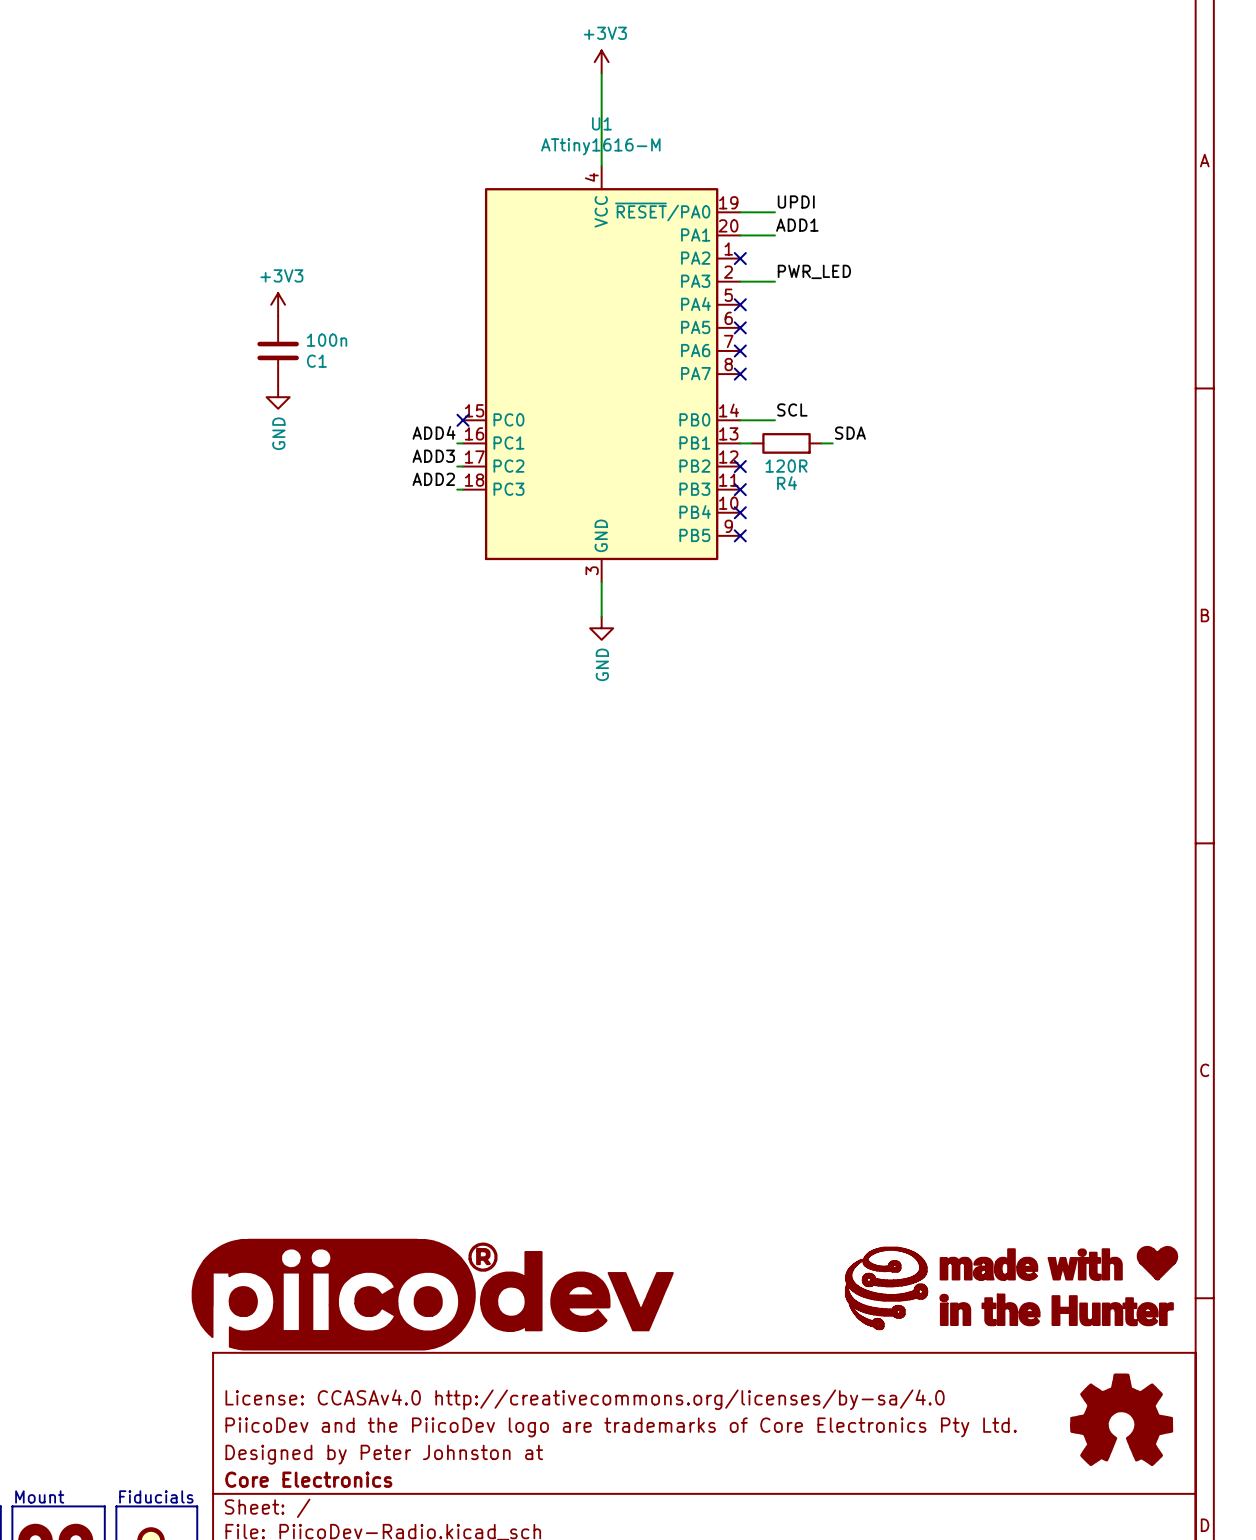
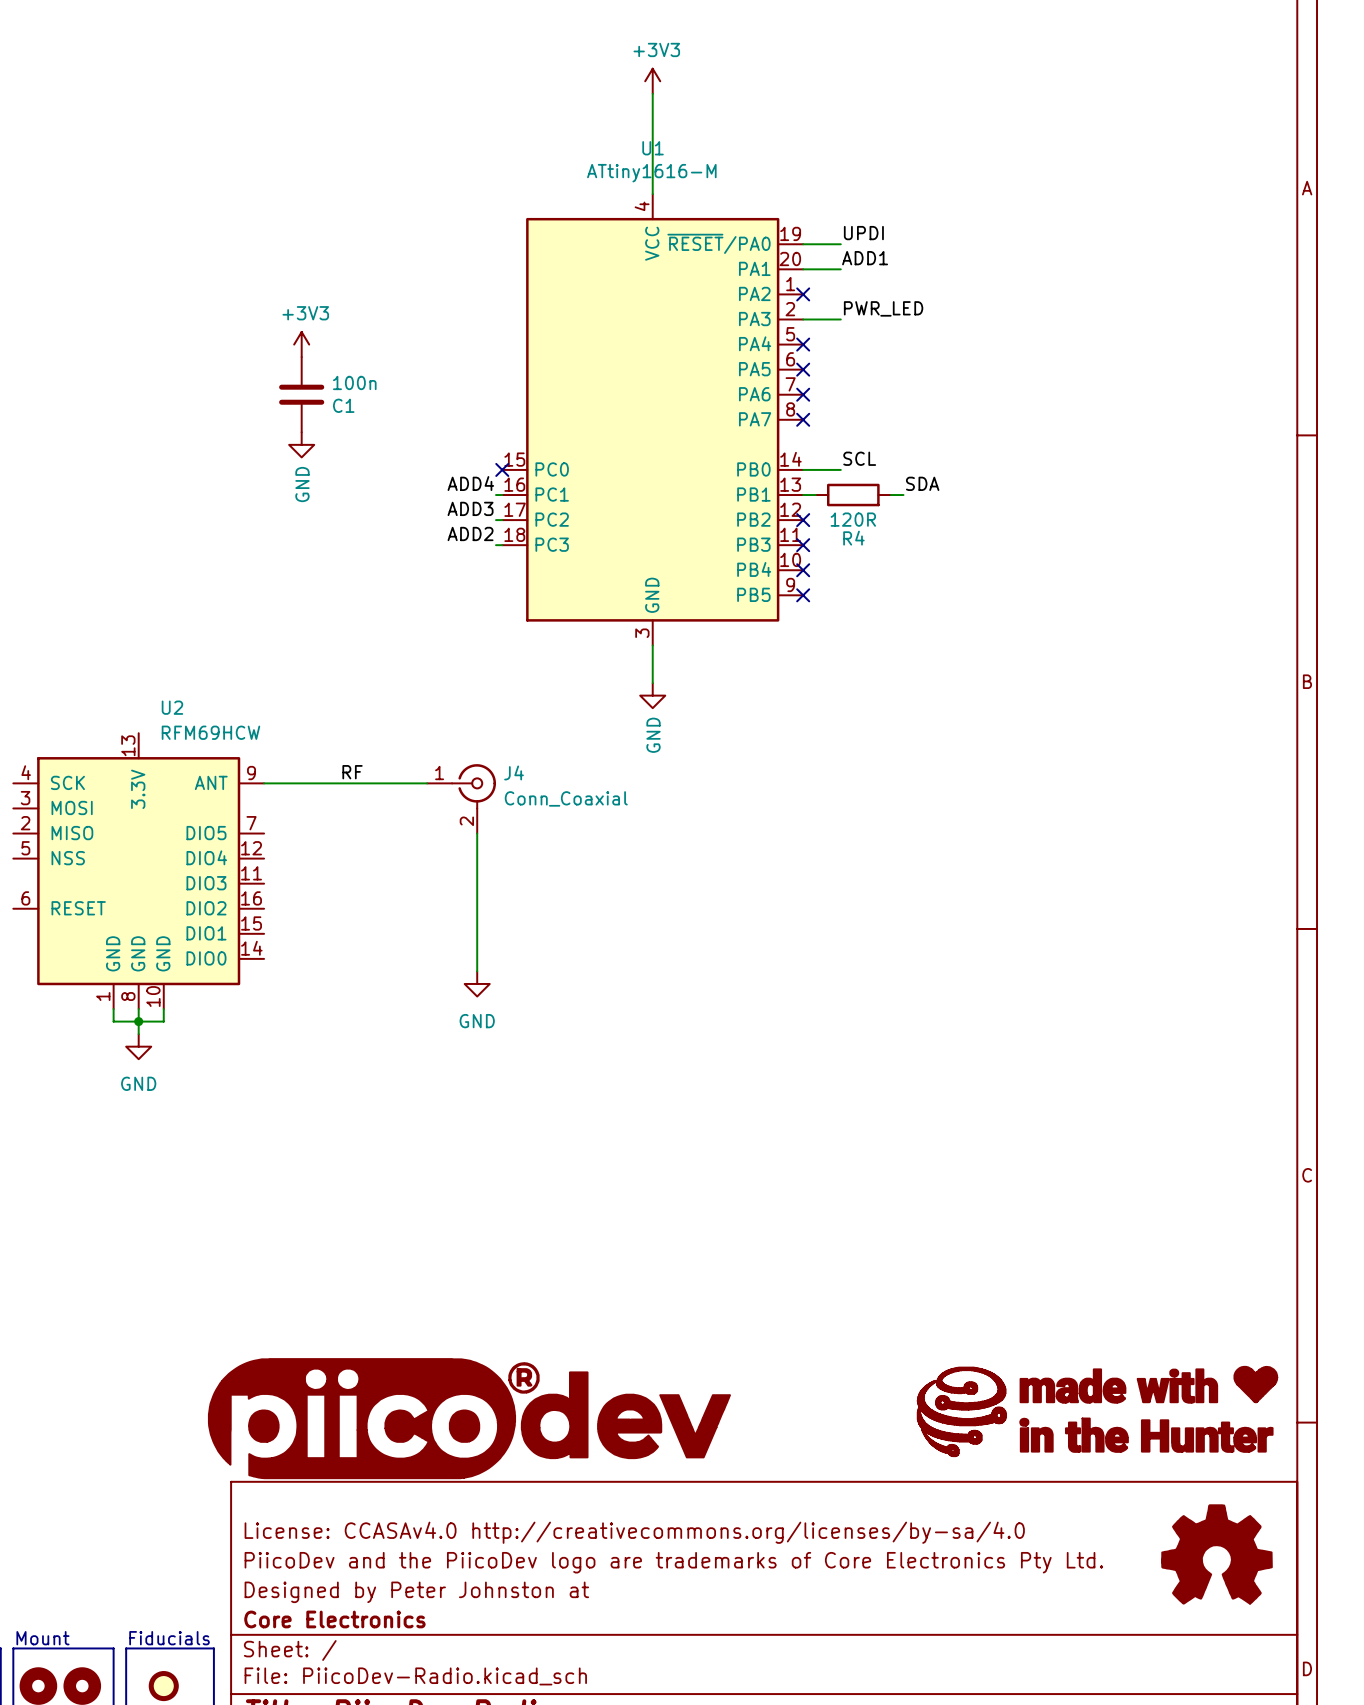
label: none -> RF (352, 772)
wire: none -> (264, 783) (427, 783)
J4: none -> Conn_Coaxial (461, 798)
wire: none -> (477, 833) (477, 971)
U2: none -> RFM69HCW (138, 871)
power symbol: none -> GND (477, 983)
wire: none -> (113, 1009) (113, 1021) (163, 1021) (163, 1009)
wire: none -> (138, 1009) (138, 1034)
junction: none -> (138, 1021)
power symbol: none -> GND (138, 1046)

